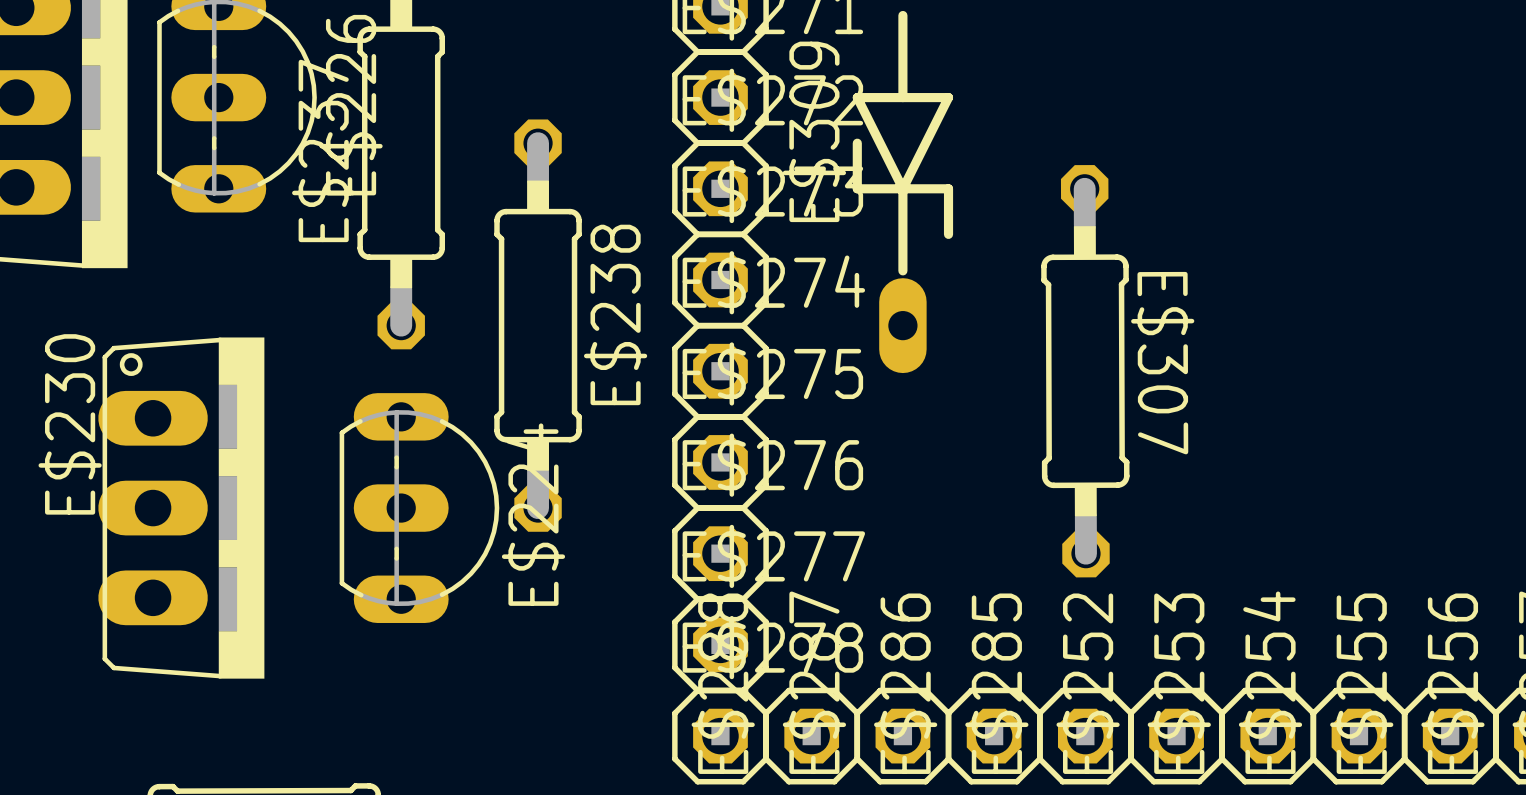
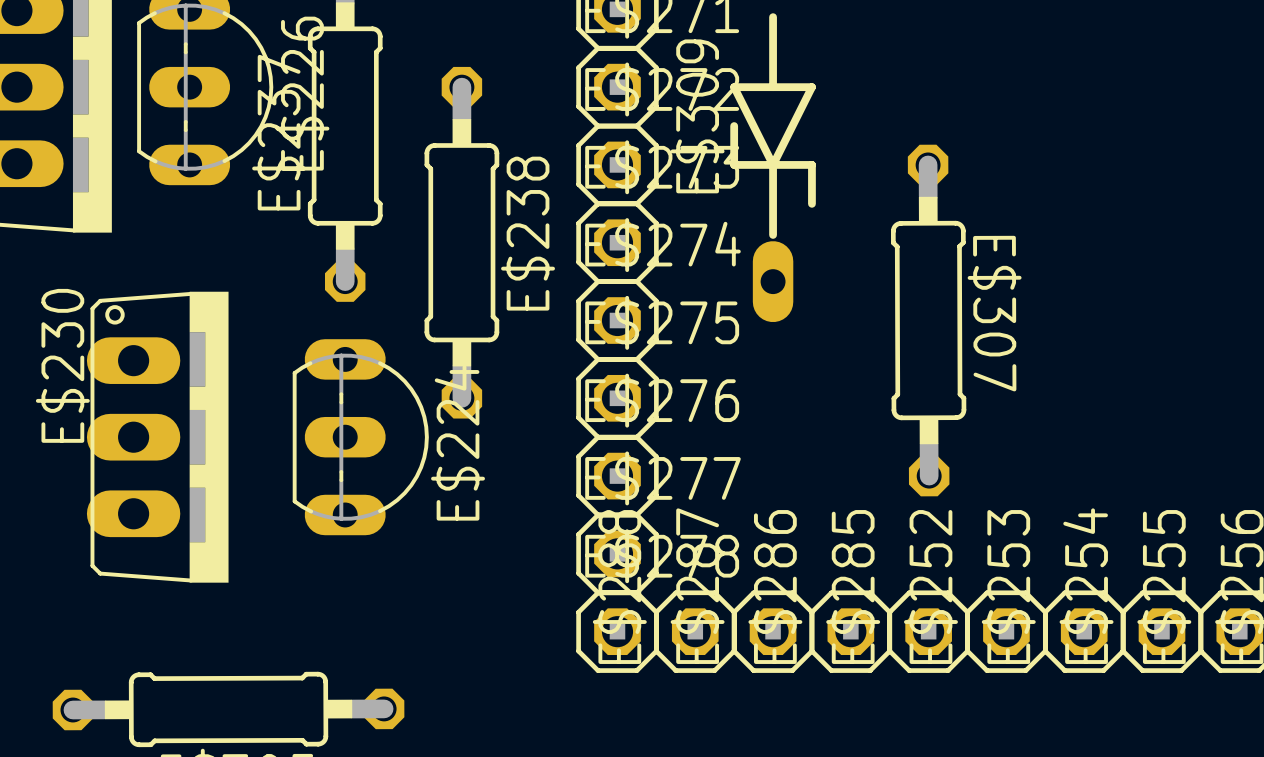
E$238 position: (538, 325) -> (461, 242)

